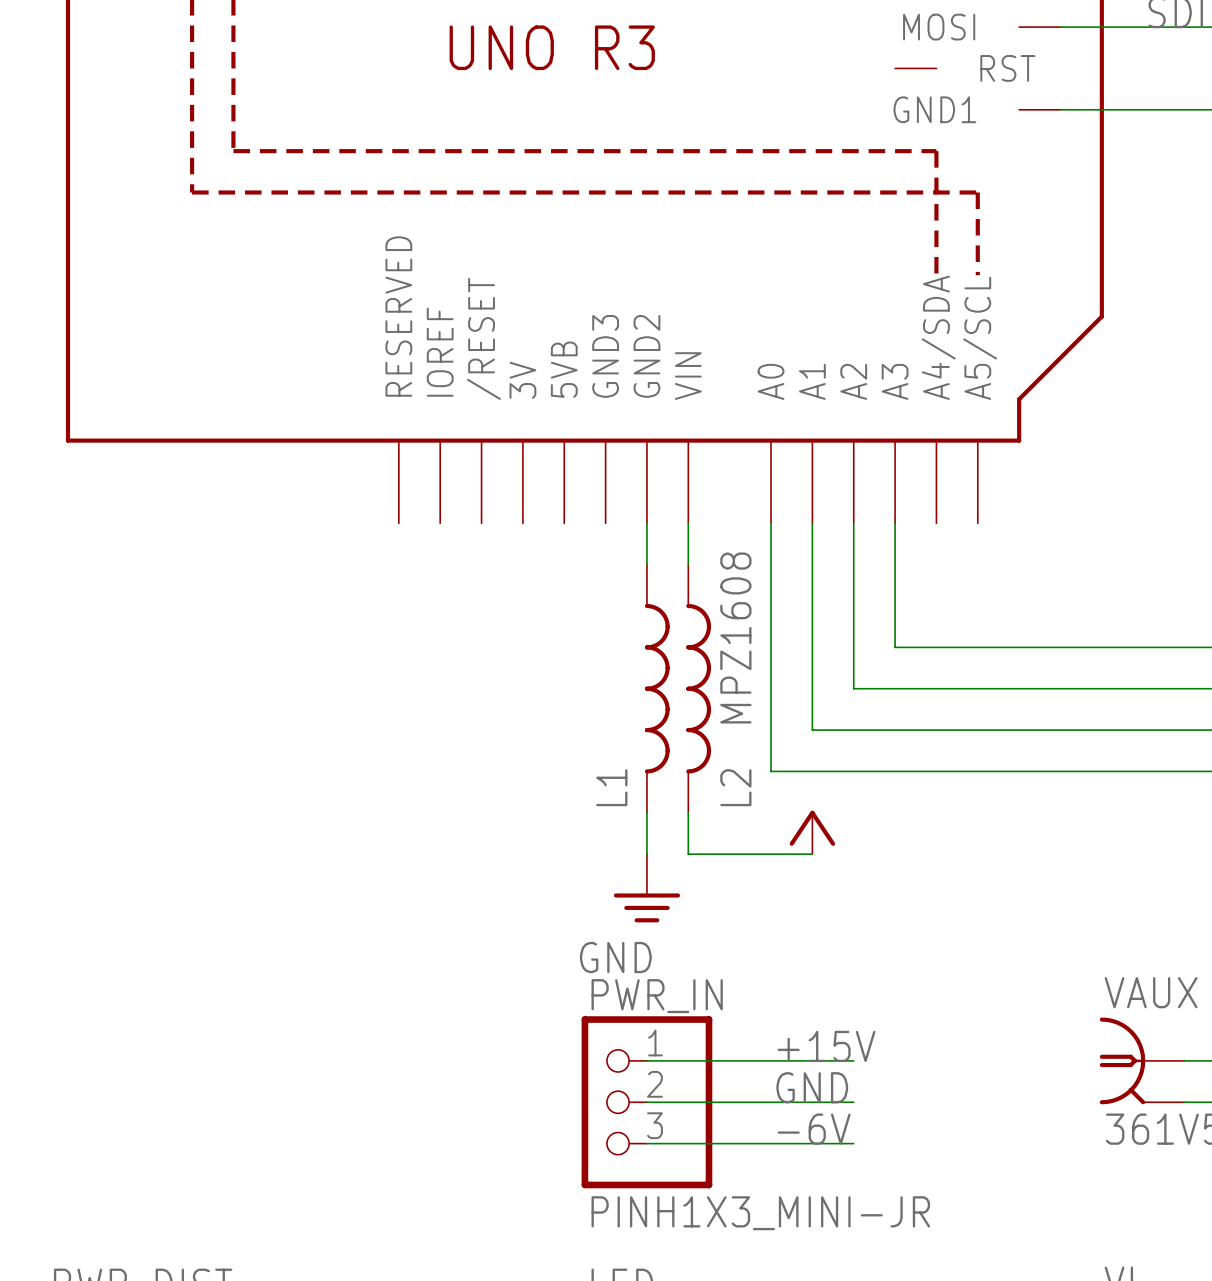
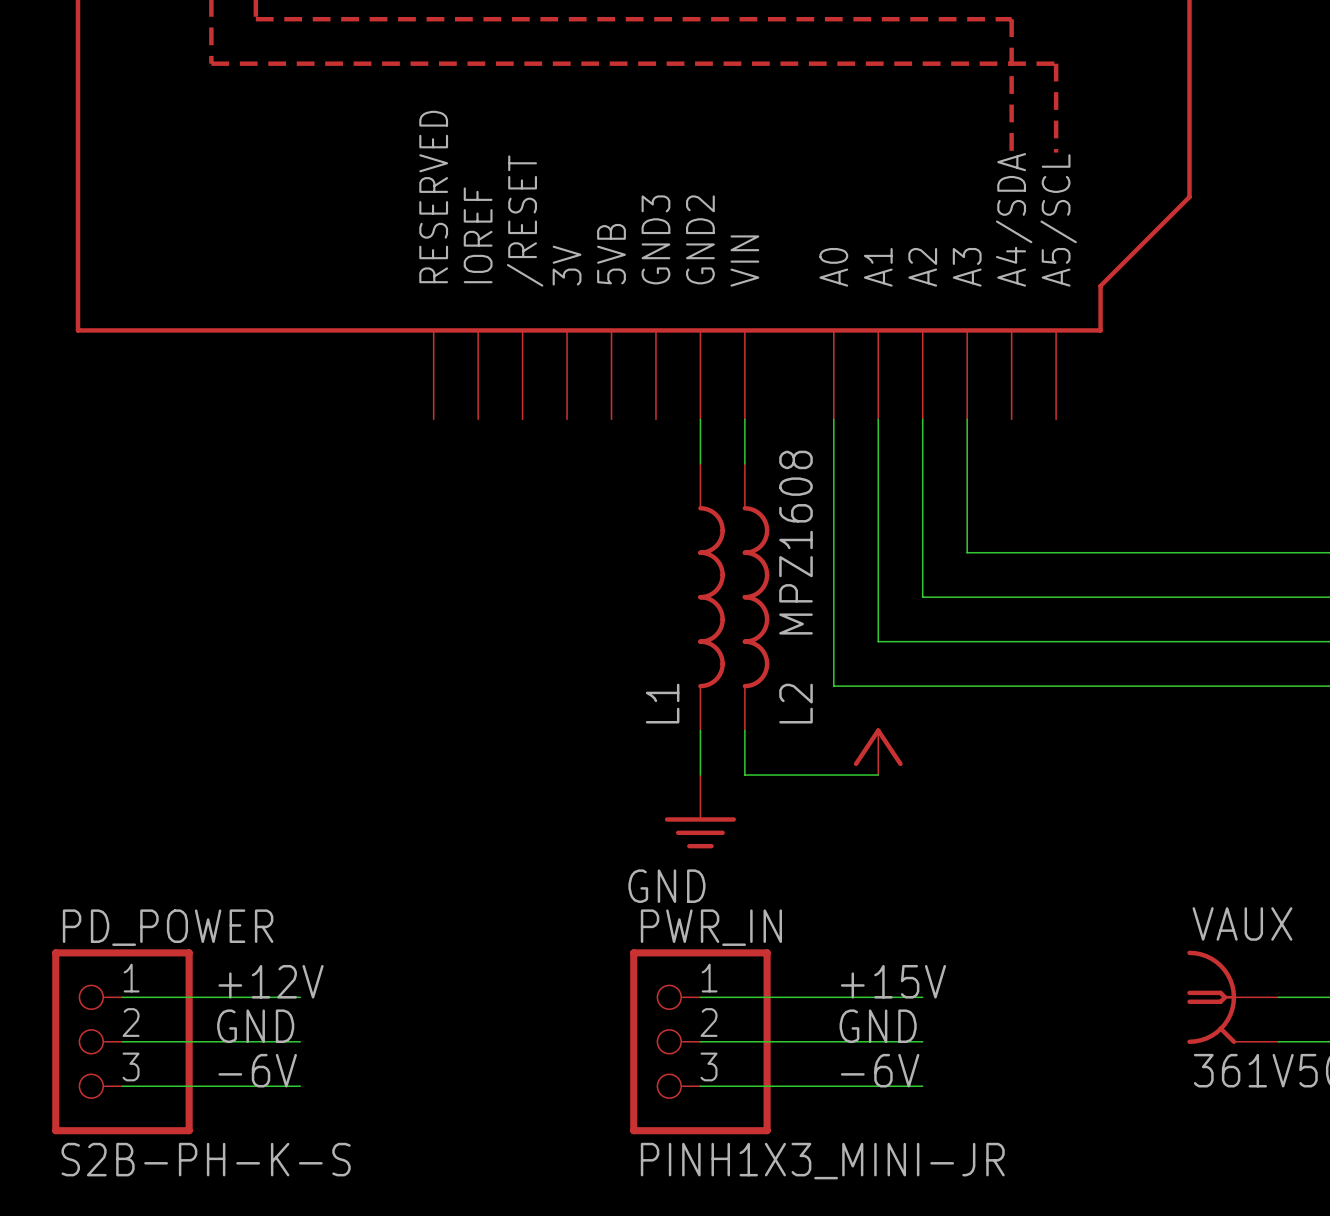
label: none -> +12V (271, 981)
wire: none -> (122, 997) (300, 997)
label: none -> GND (255, 1026)
wire: none -> (122, 1041) (300, 1041)
PD_POWER: none -> S2B-PH-K-S (122, 1041)
label: none -> -6V (257, 1070)
wire: none -> (122, 1086) (300, 1086)

